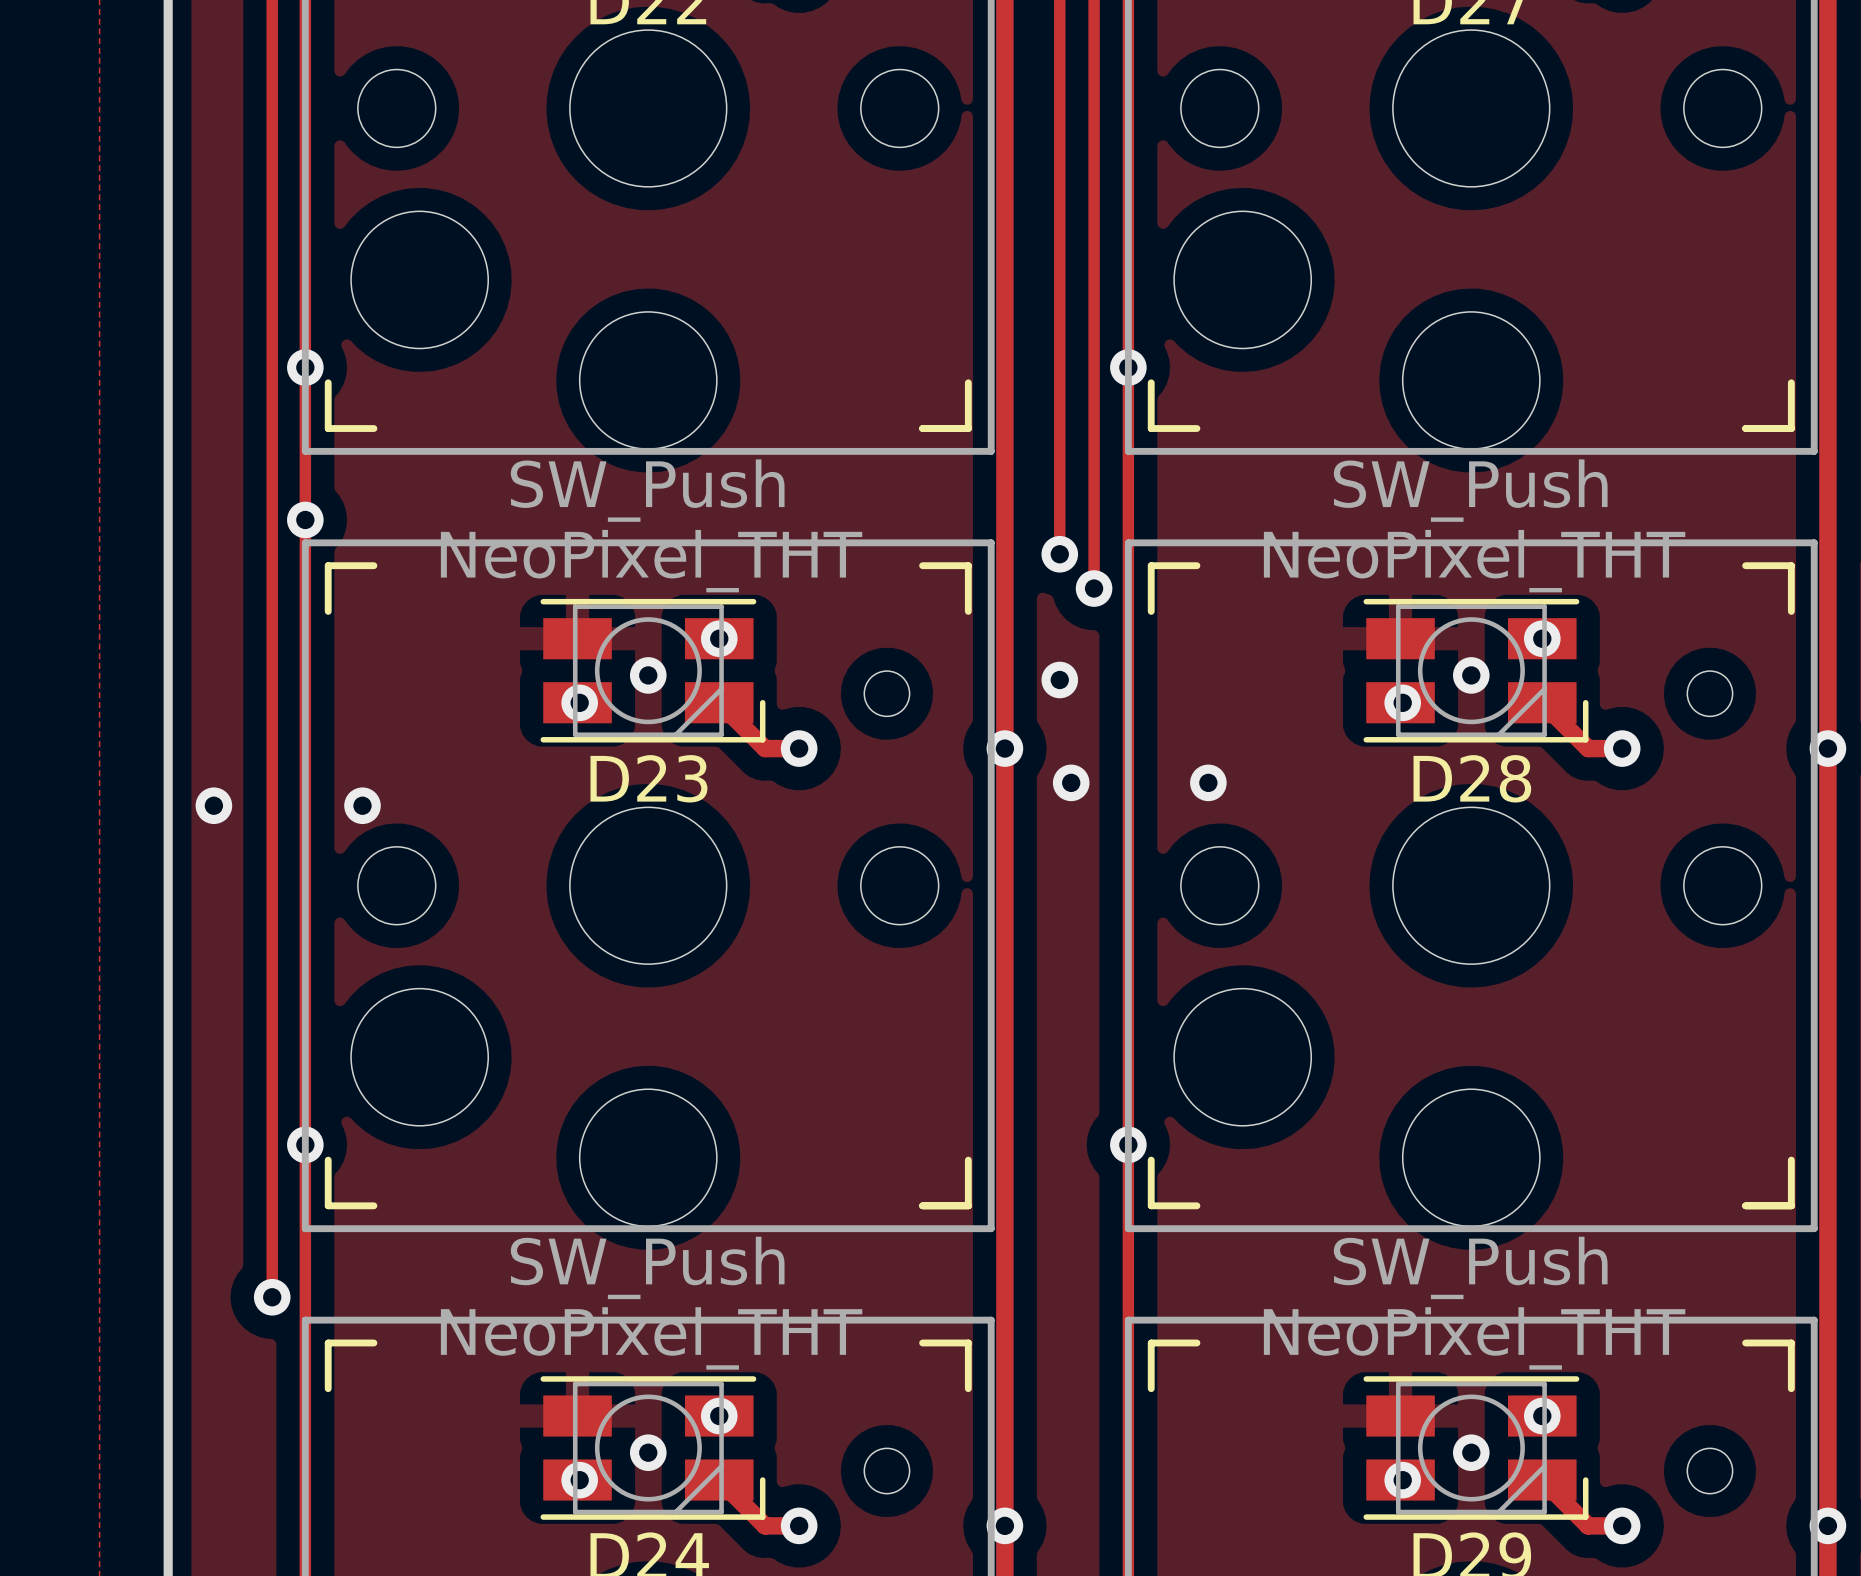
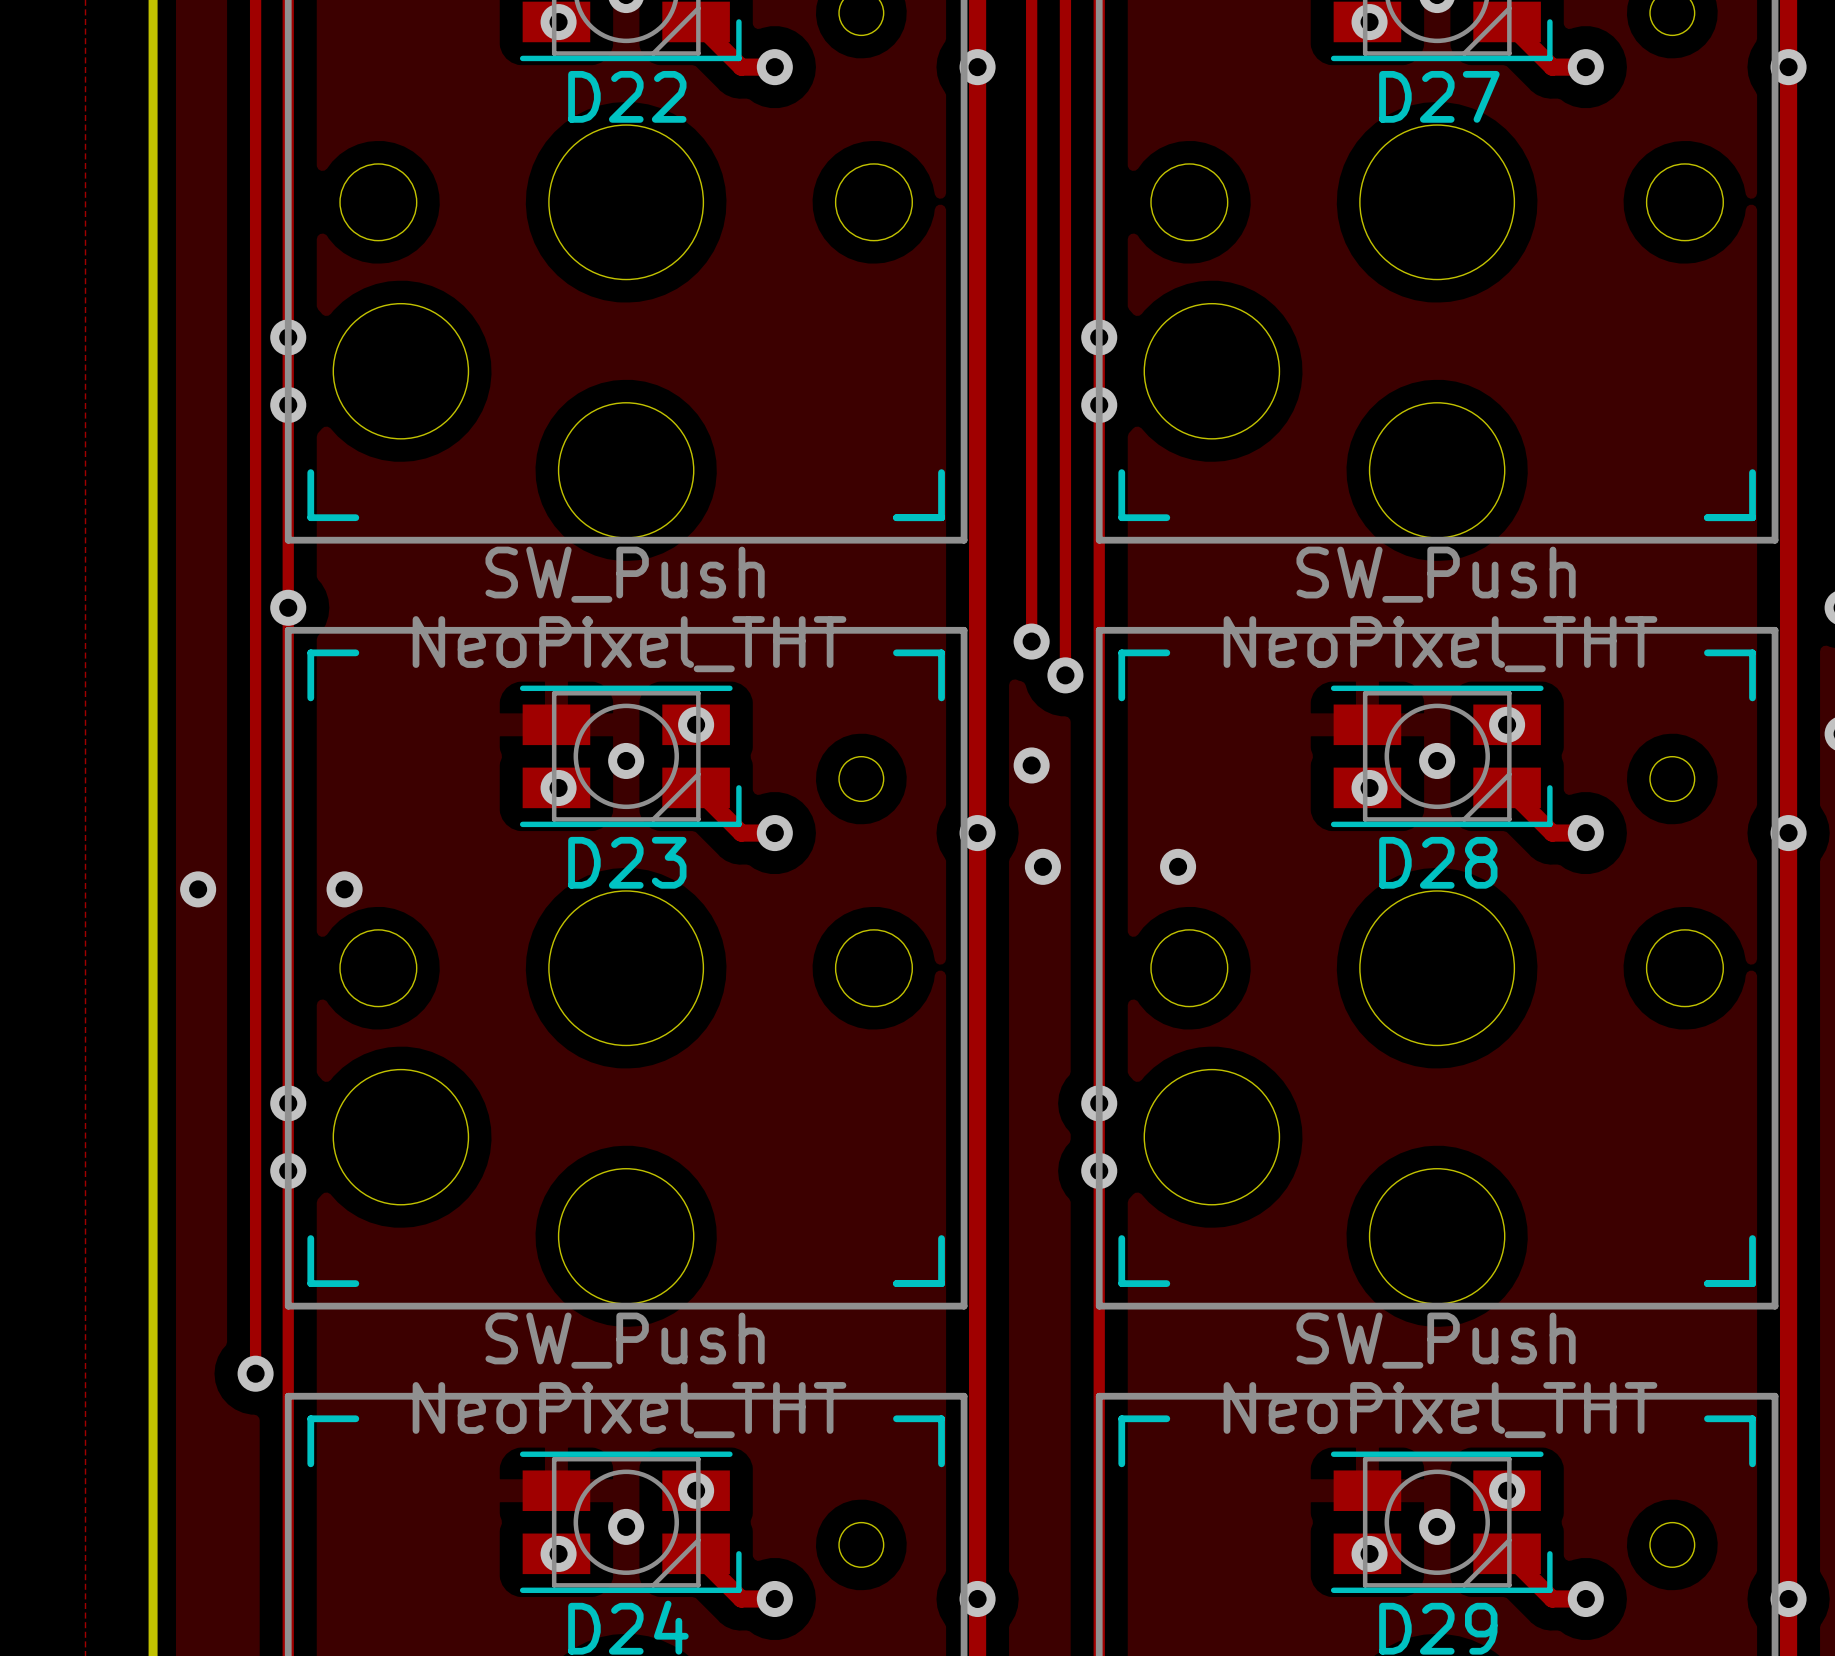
via: none -> (288, 337)
via: none -> (1099, 337)
via position: (305, 367) -> (288, 405)
via position: (1128, 367) -> (1099, 405)
via: none -> (288, 1103)
via: none -> (1099, 1103)
via position: (305, 1144) -> (288, 1170)
via position: (1128, 1144) -> (1099, 1170)

